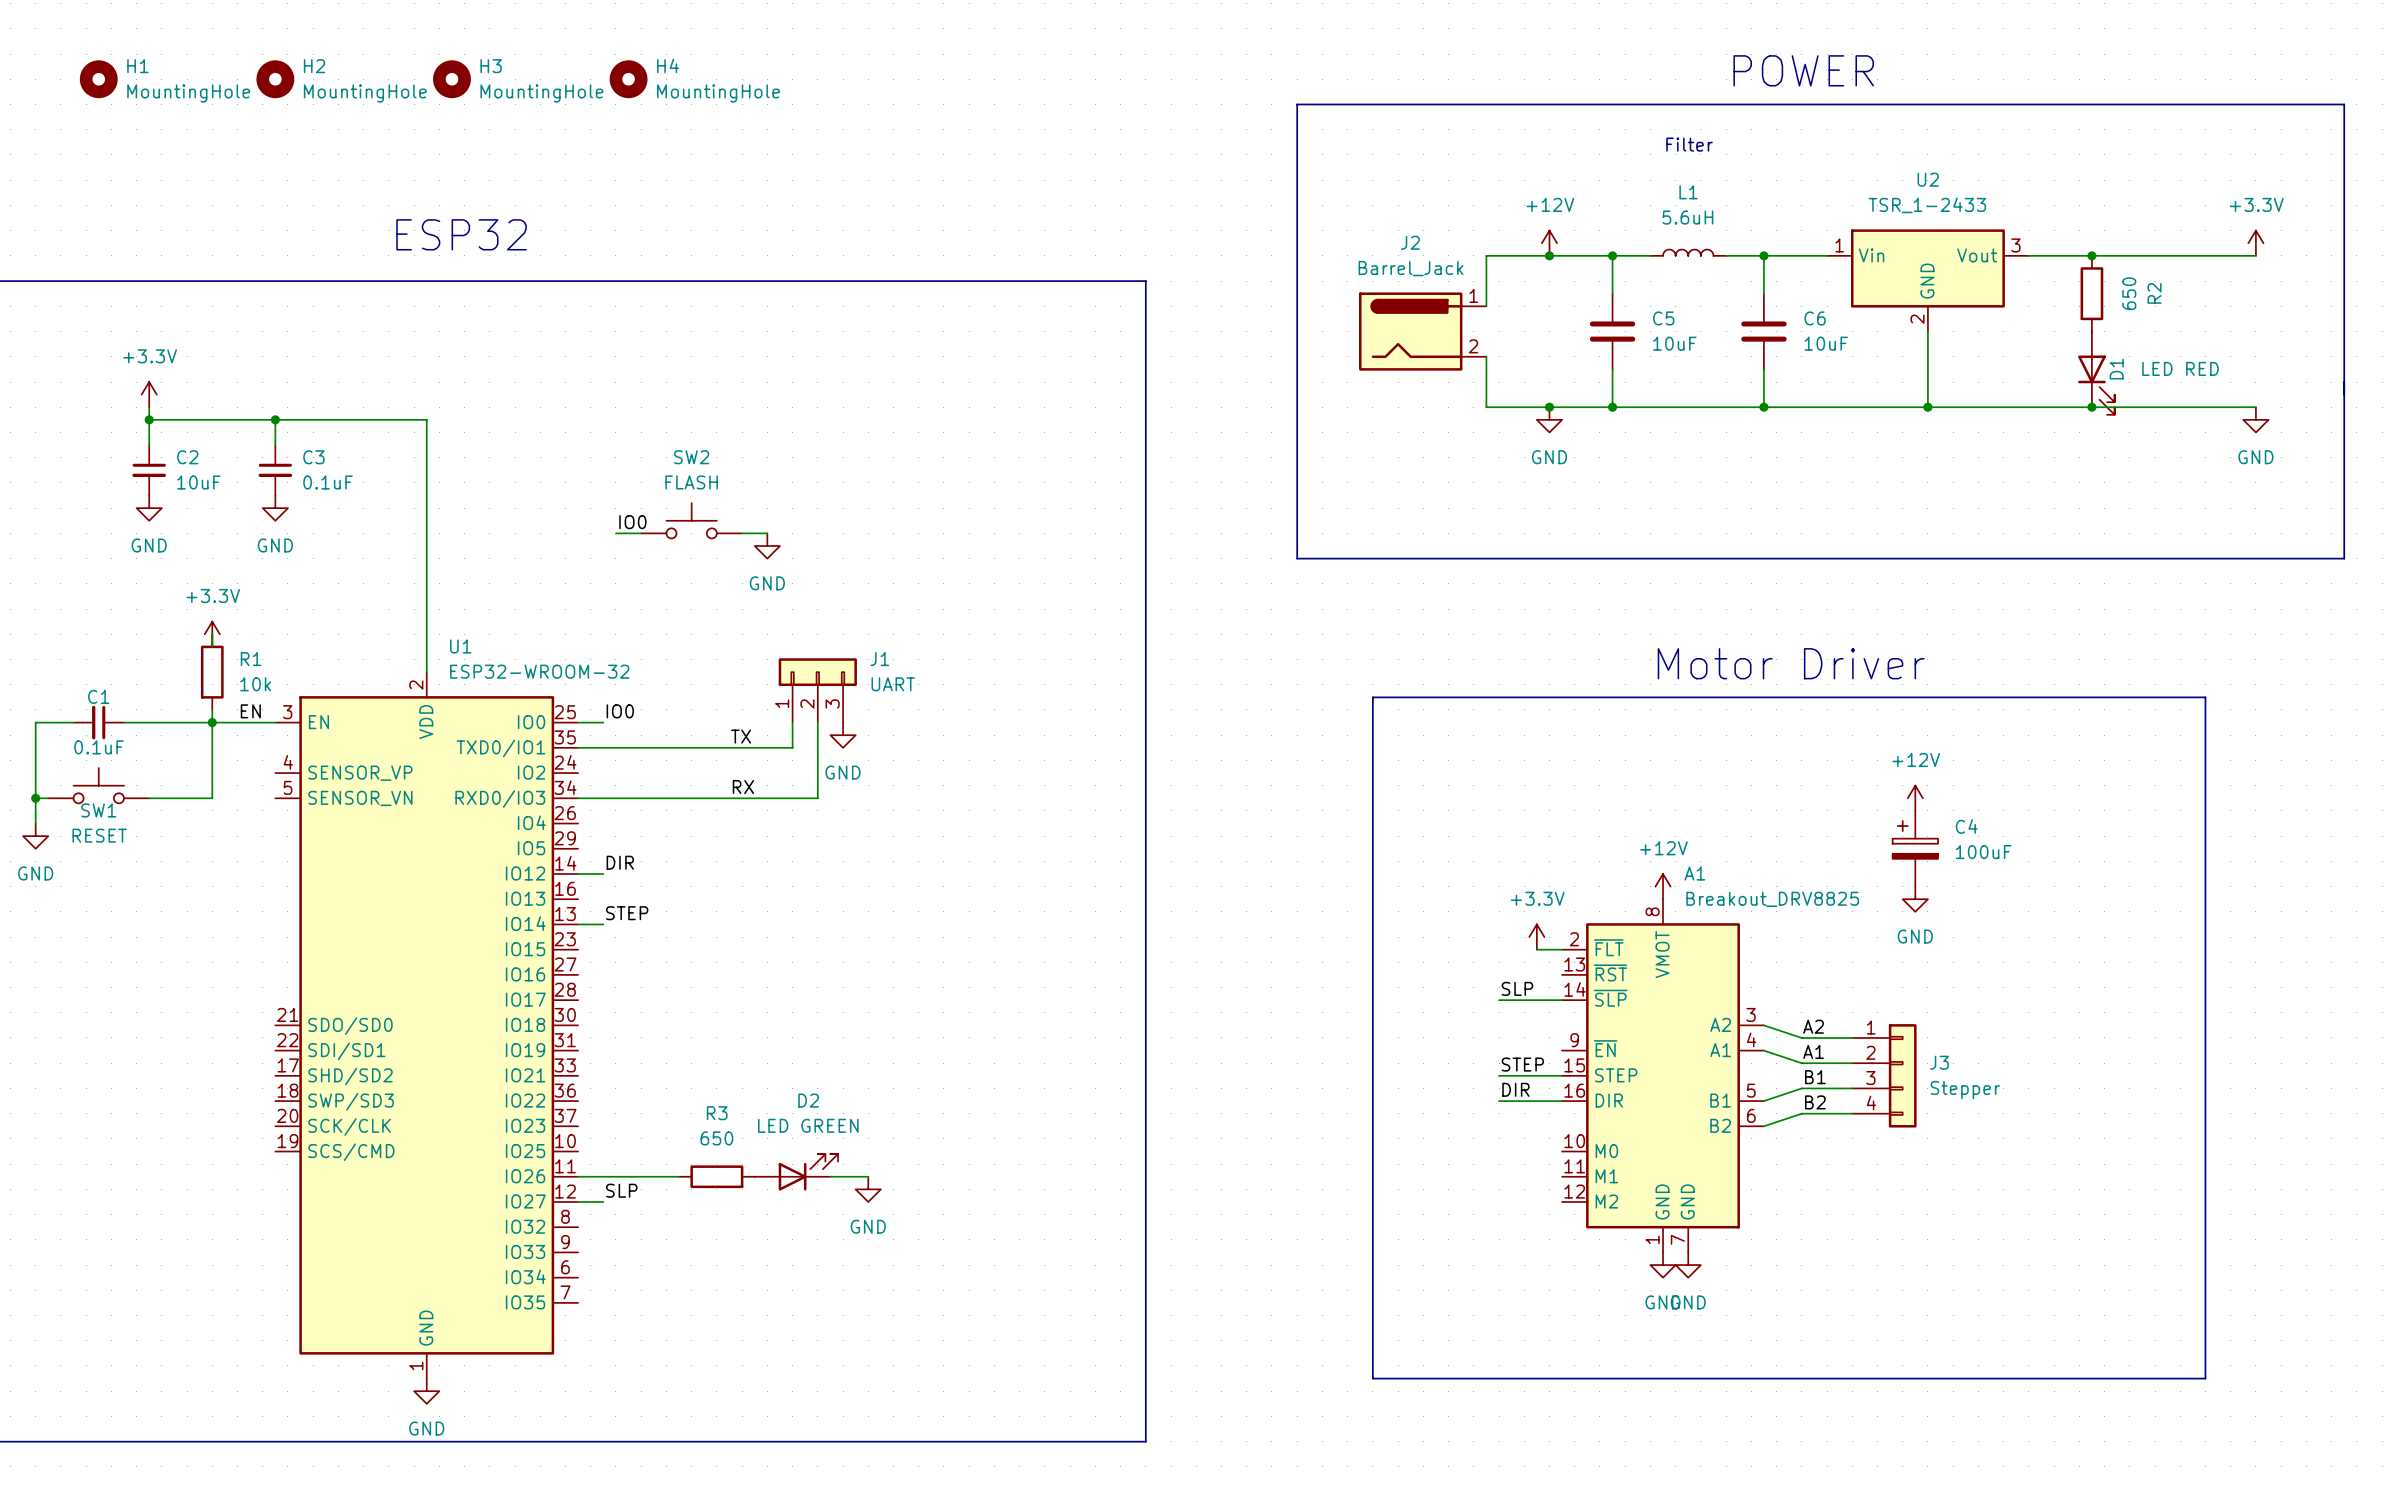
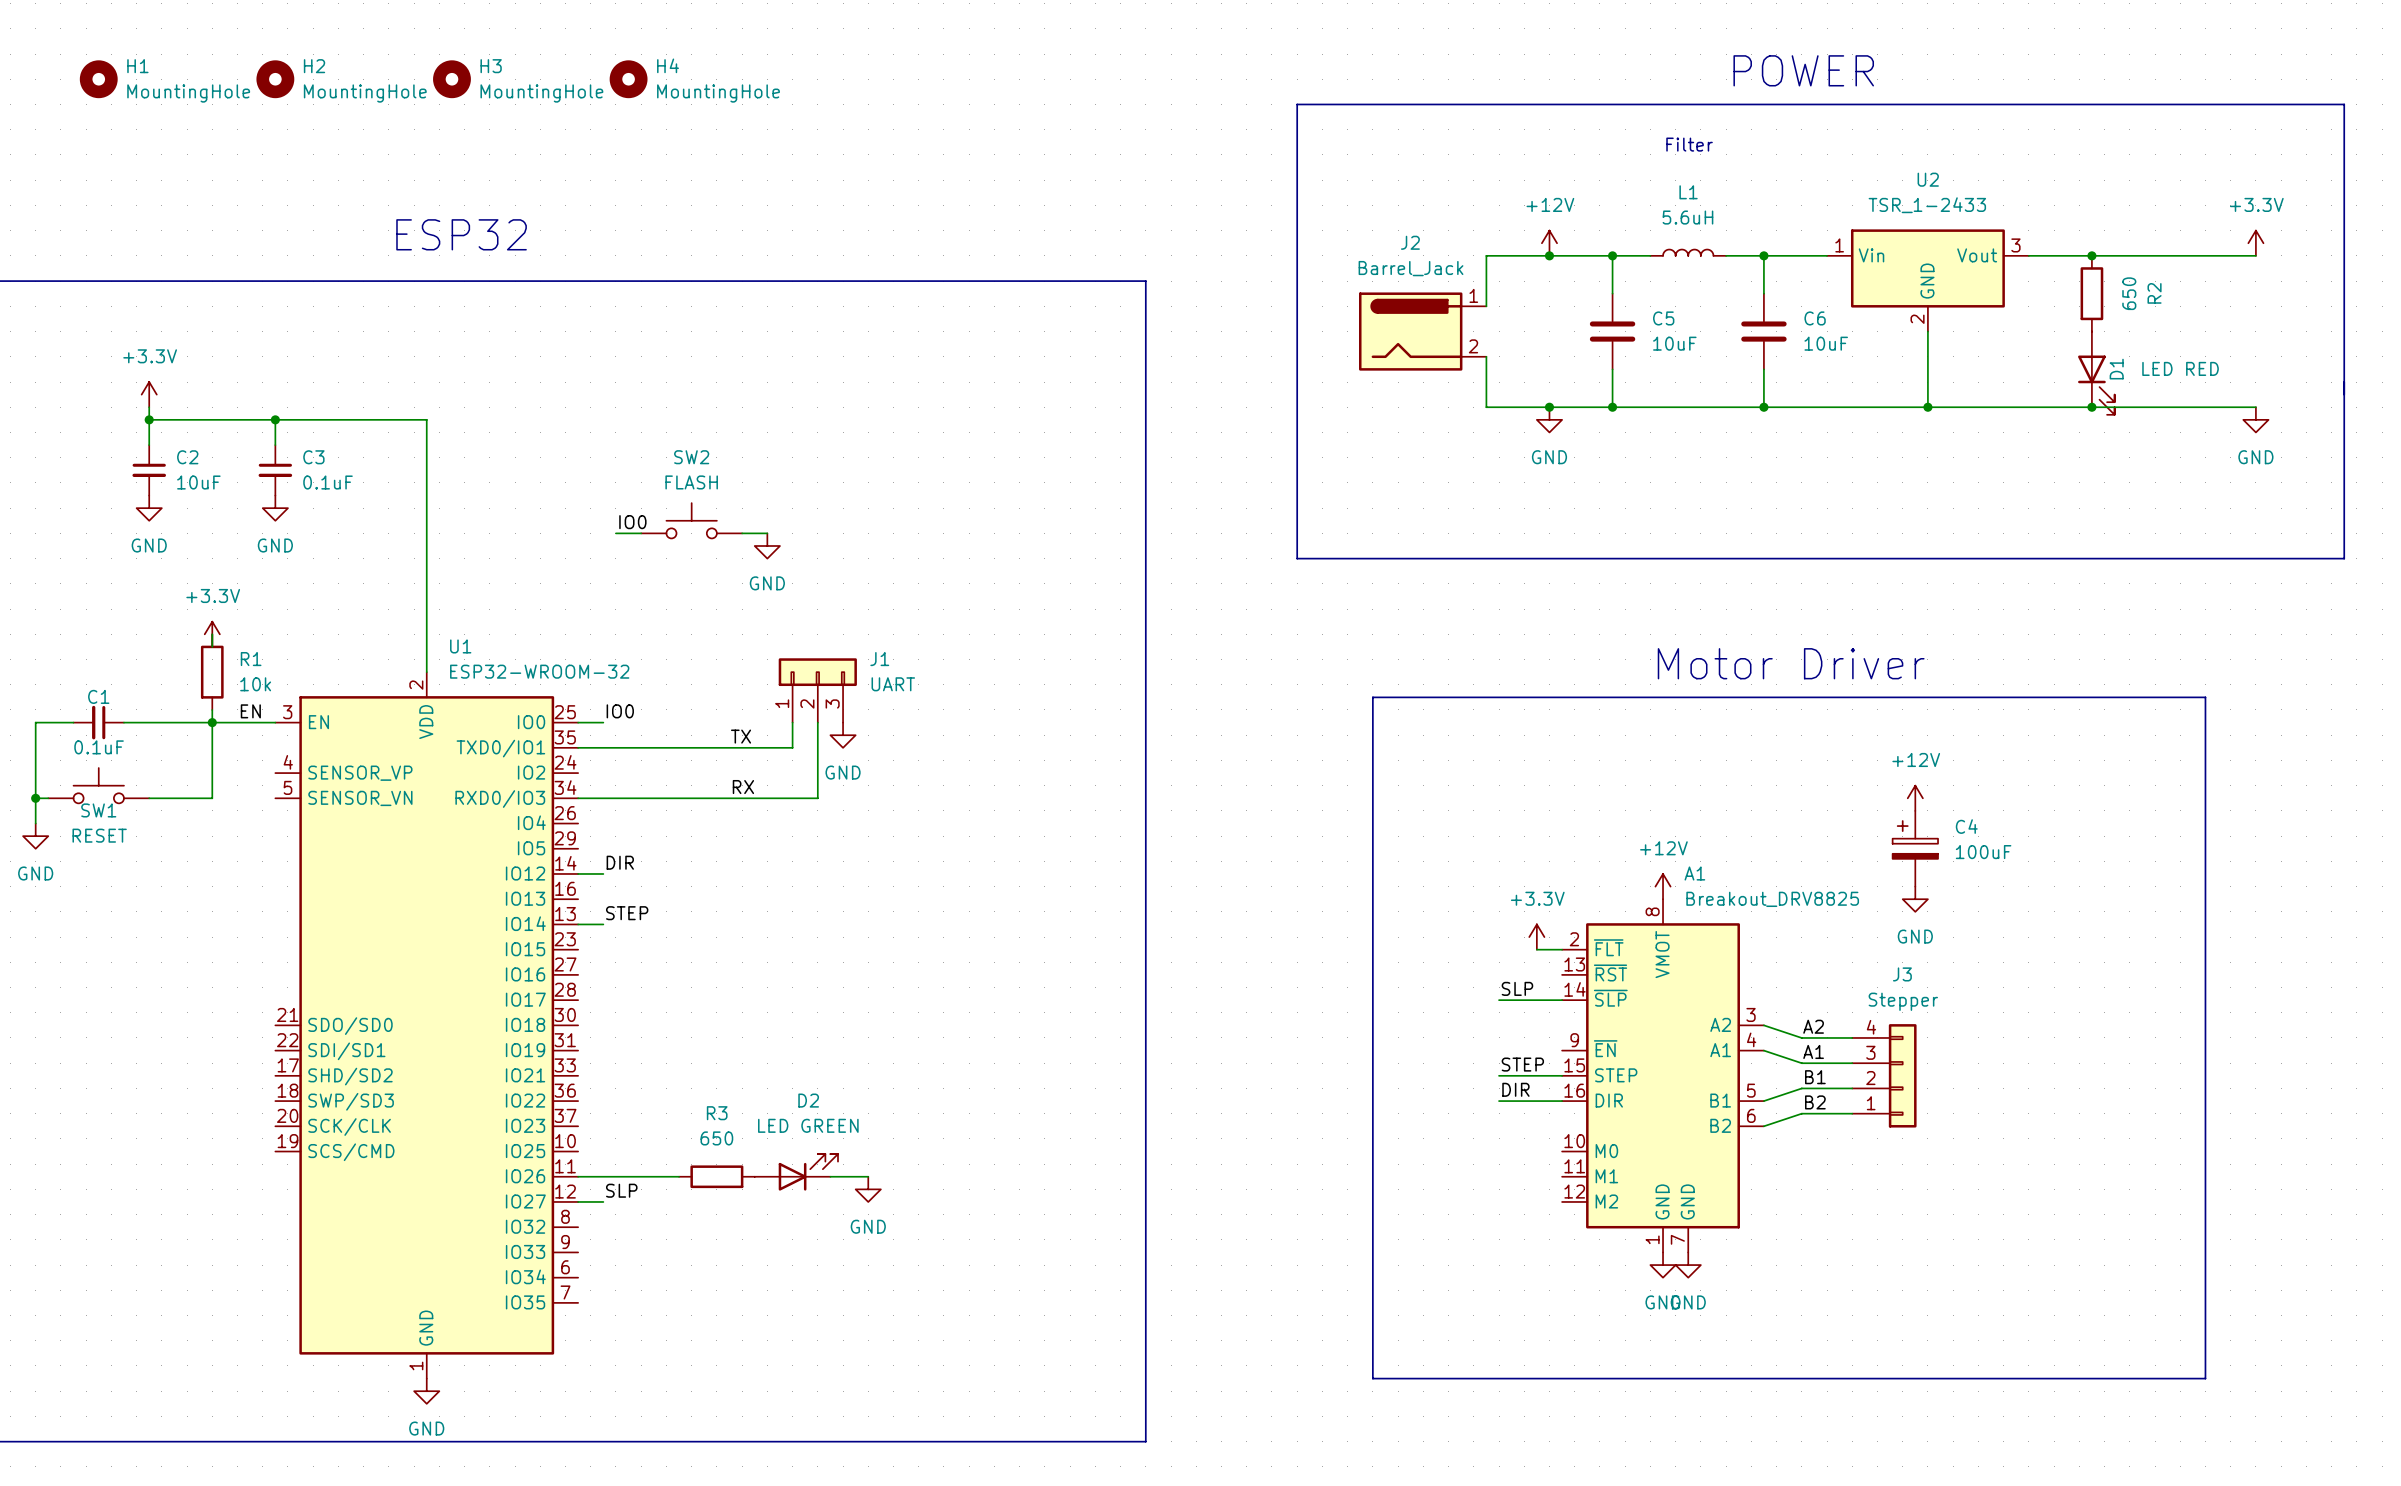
J3 name position: J3 (1939, 1062) -> J3 (1902, 974)
J3 flip: as is (1902, 1075) -> up-down (1902, 1075)
J3 value position: Stepper (1965, 1090) -> Stepper (1903, 1001)

